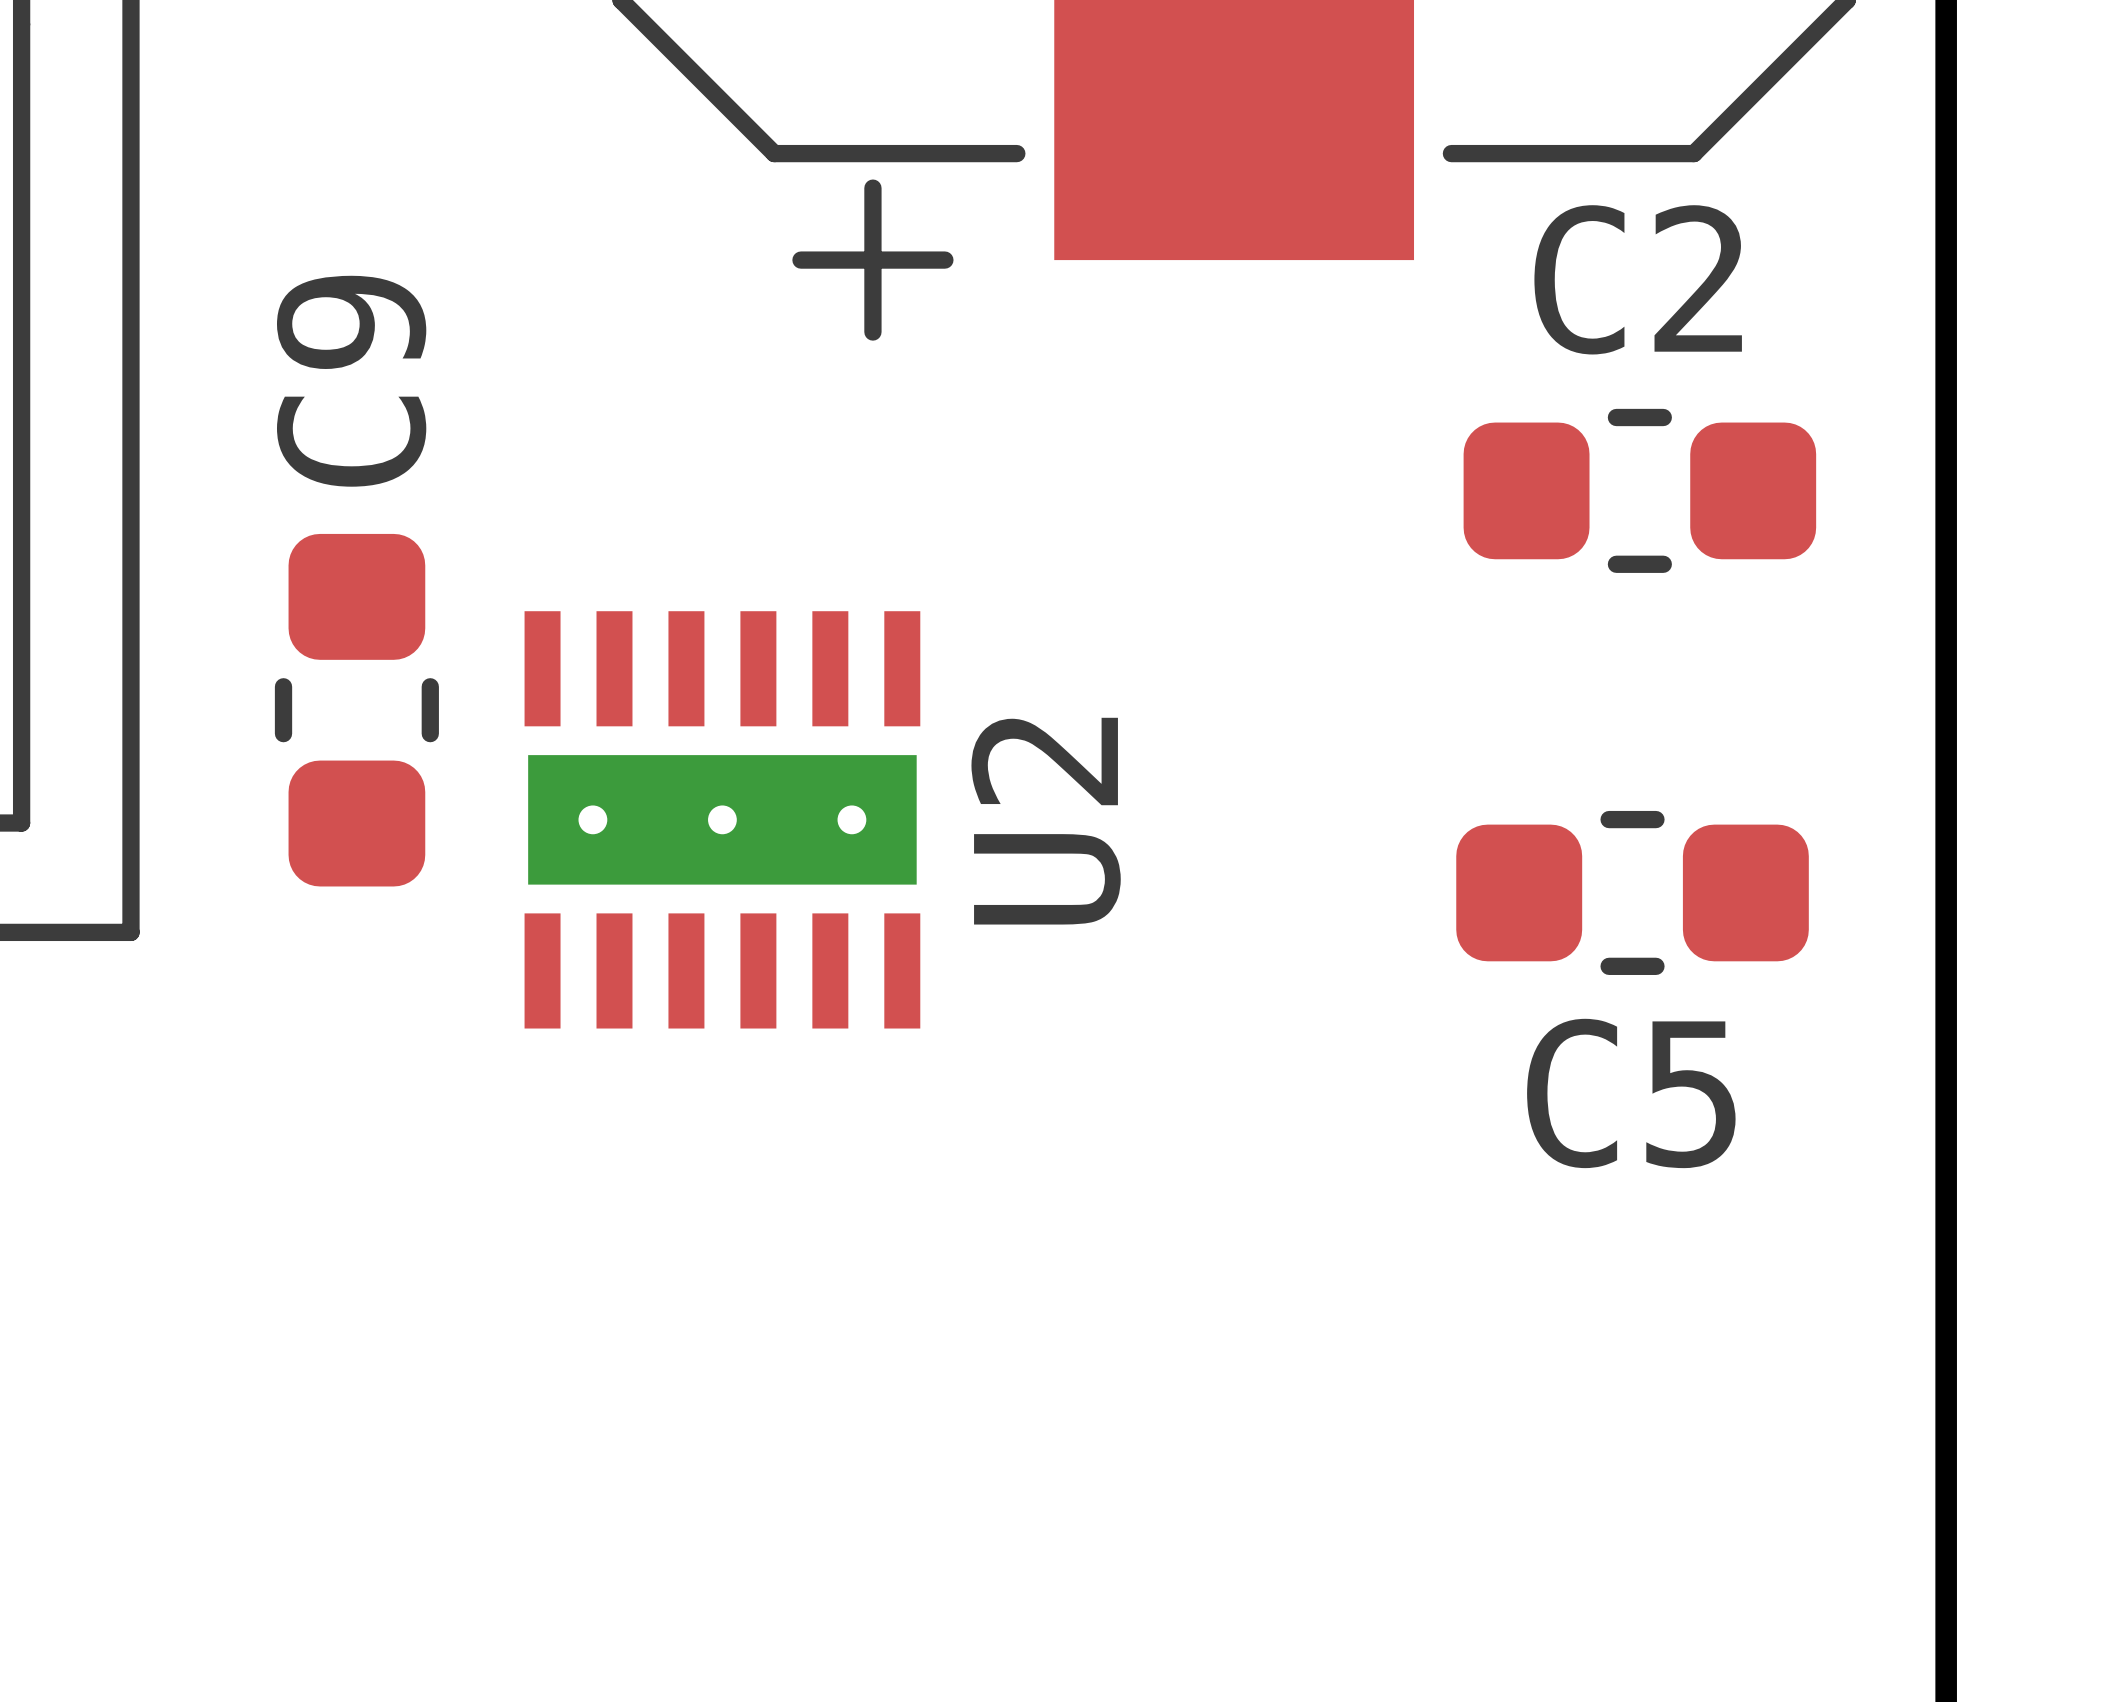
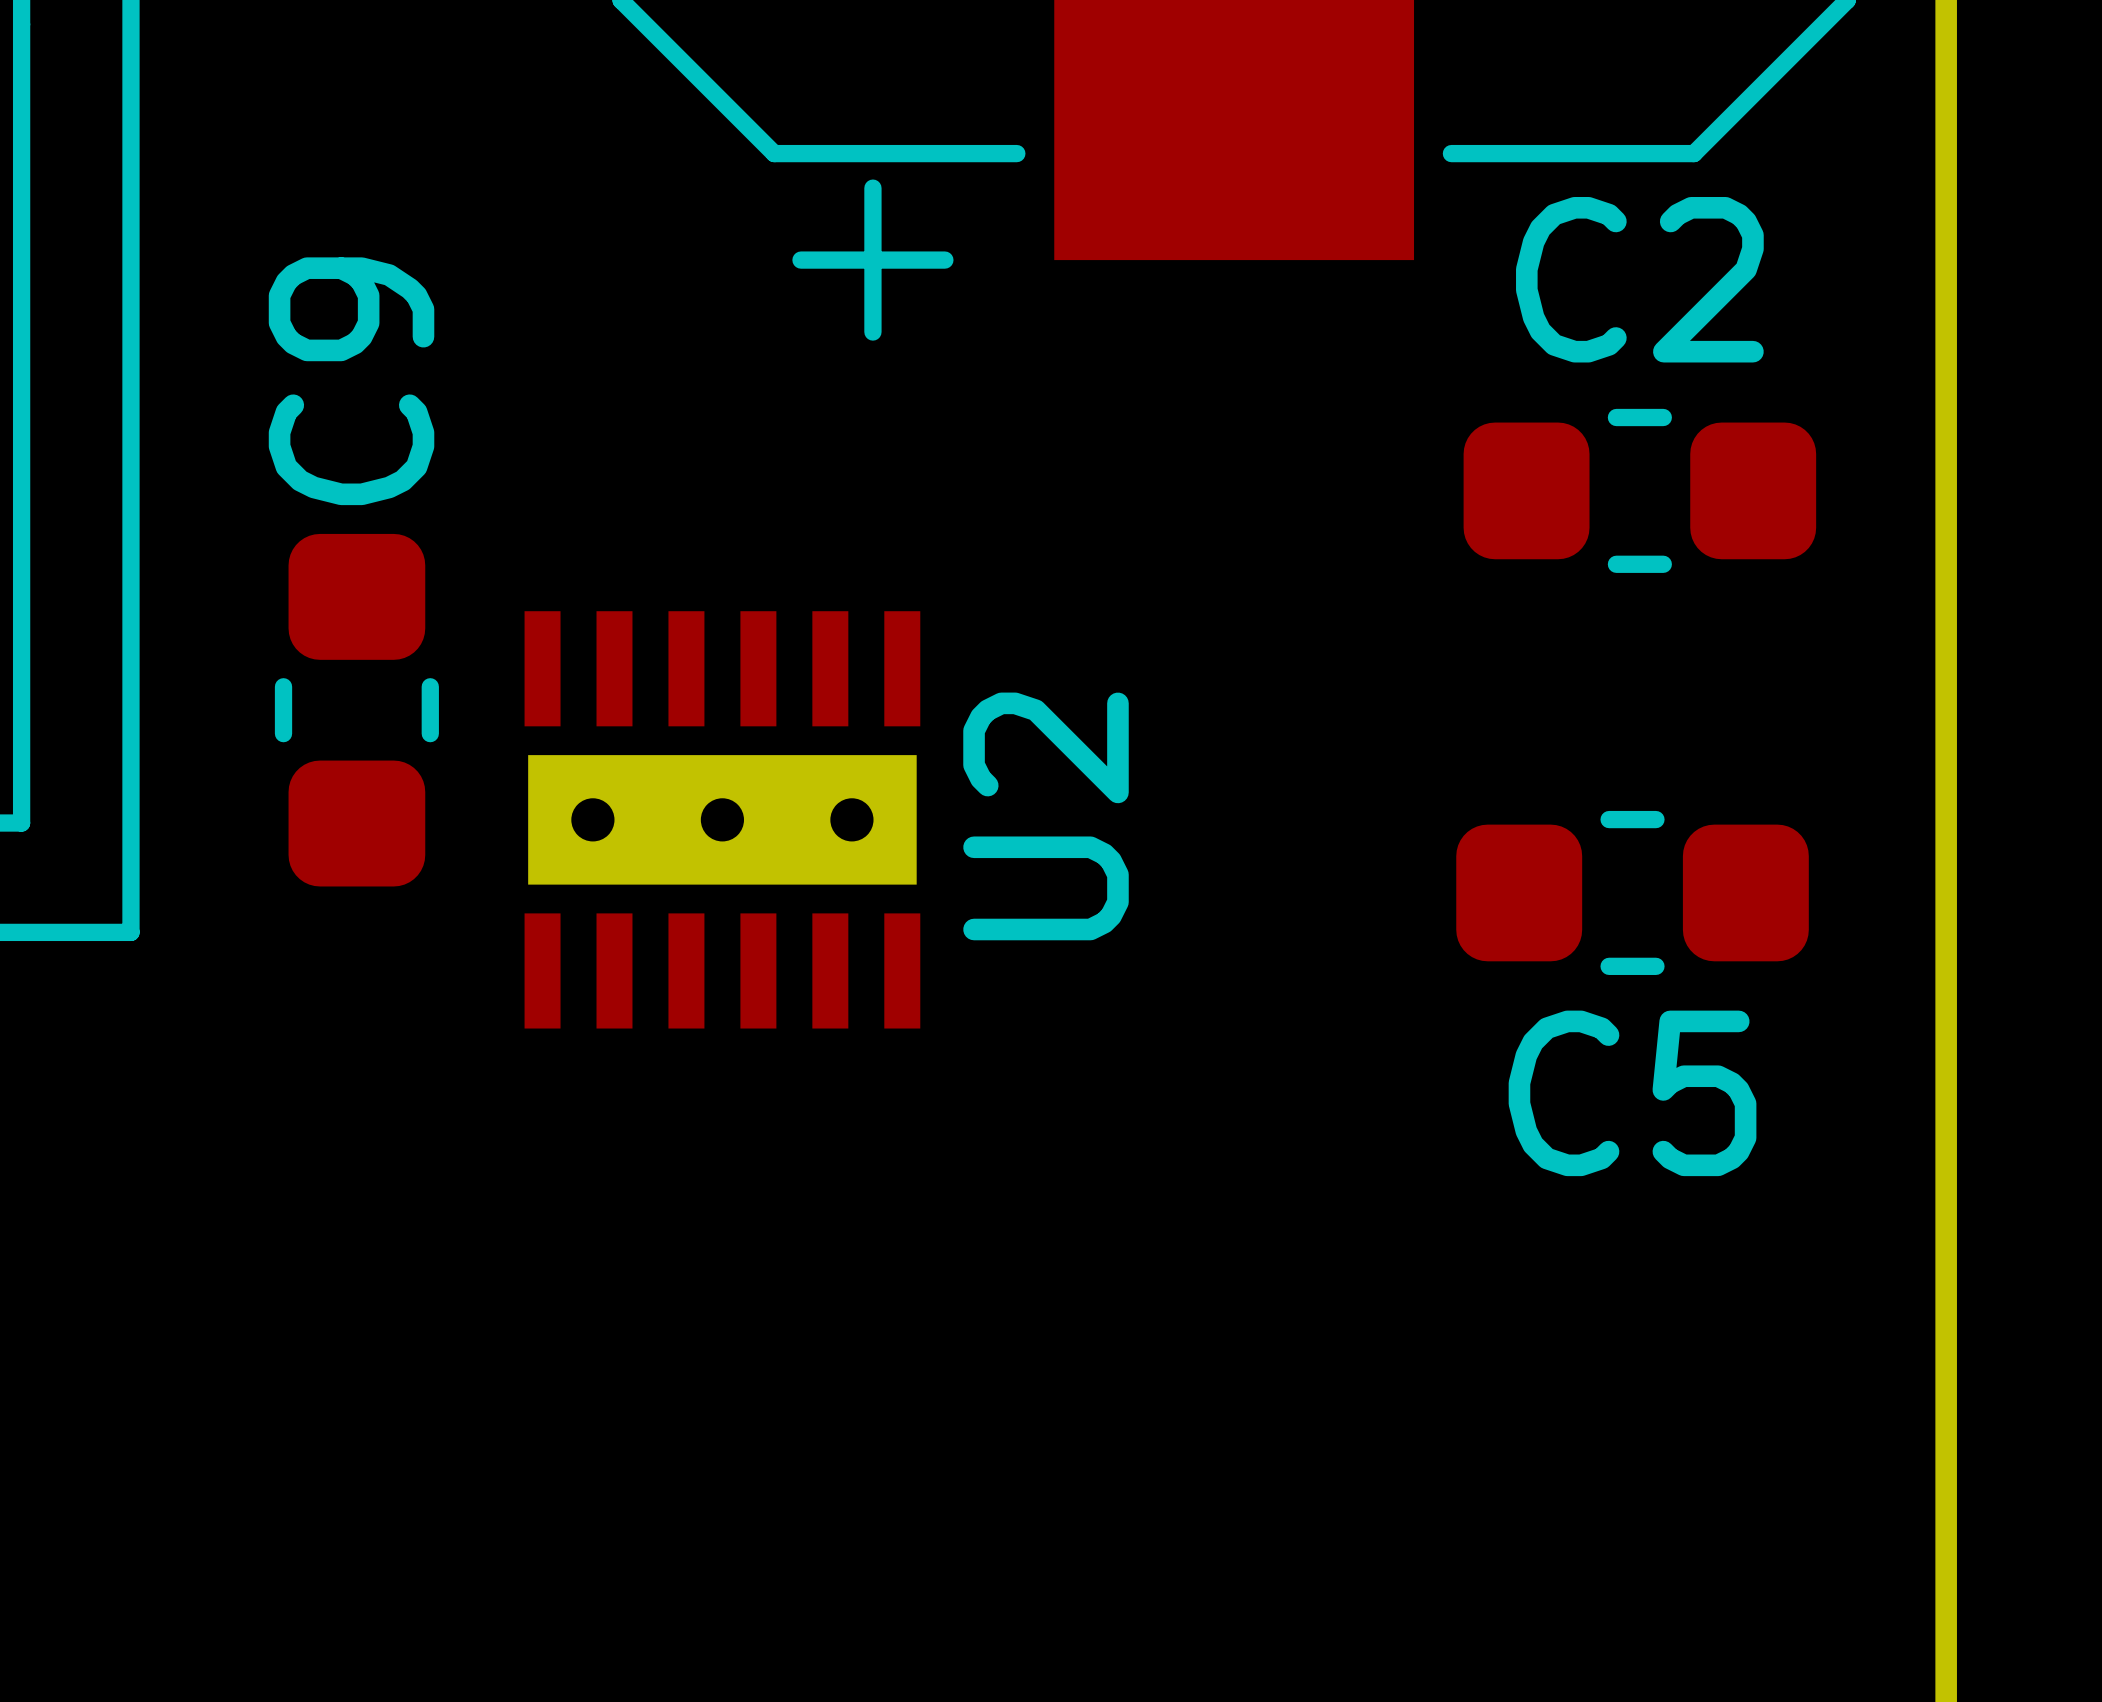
U2 footprint: [524, 611, 921, 1029] -> [524, 611, 921, 1029]

